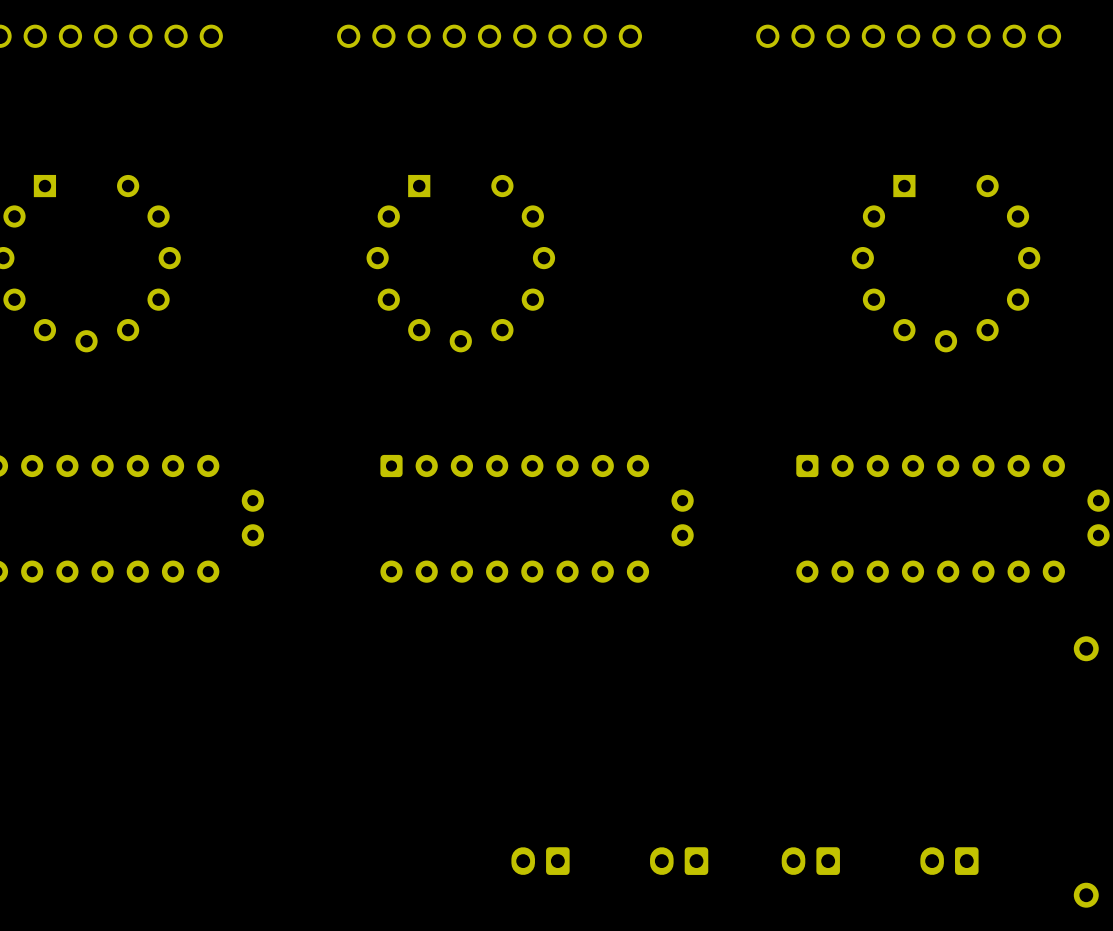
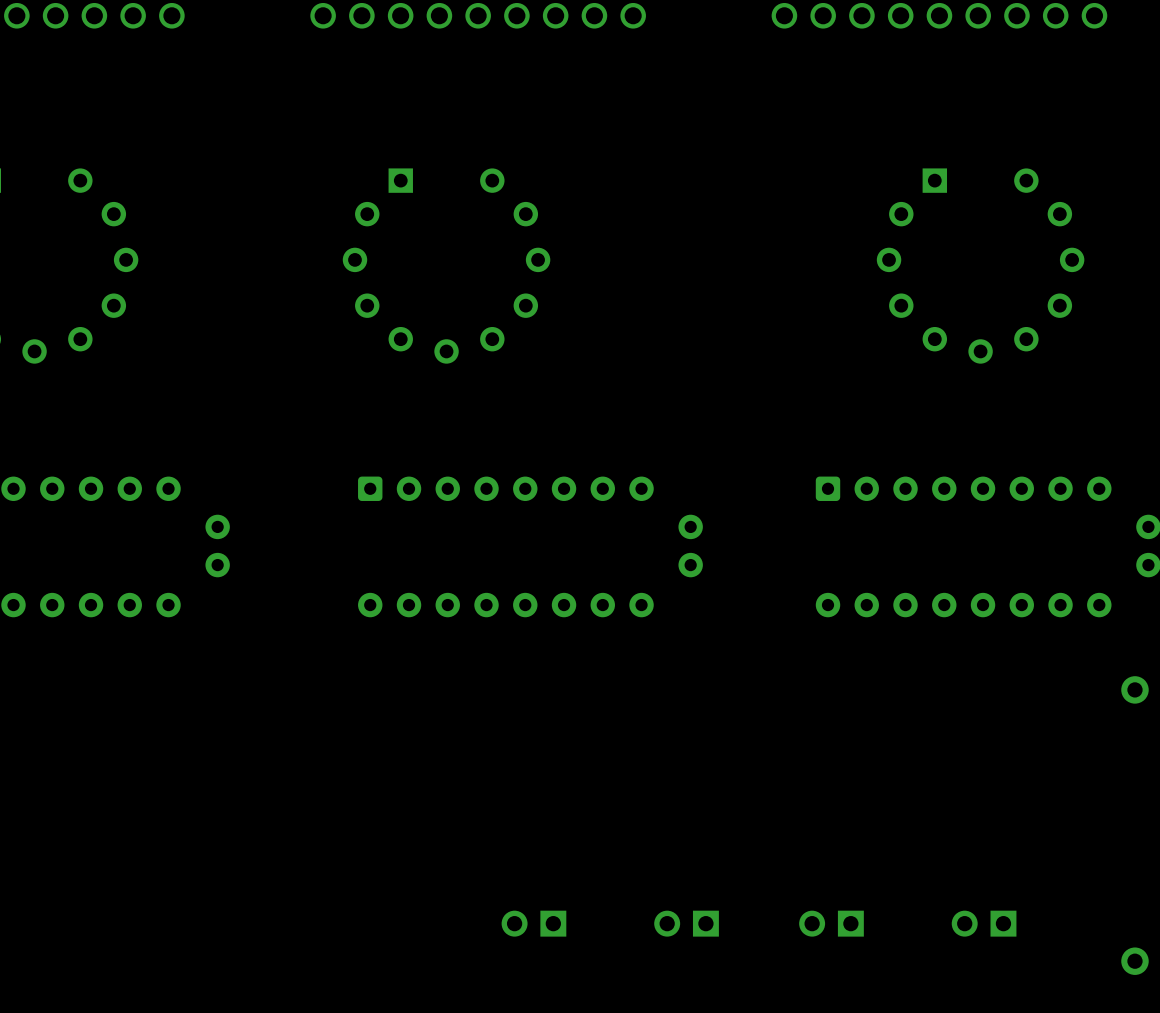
part footprint: [511, 847, 570, 875] -> [501, 910, 567, 937]
part footprint: [650, 847, 709, 875] -> [654, 910, 719, 937]
part footprint: [781, 847, 840, 875] -> [799, 910, 864, 937]
part footprint: [920, 847, 979, 875] -> [951, 910, 1017, 937]

